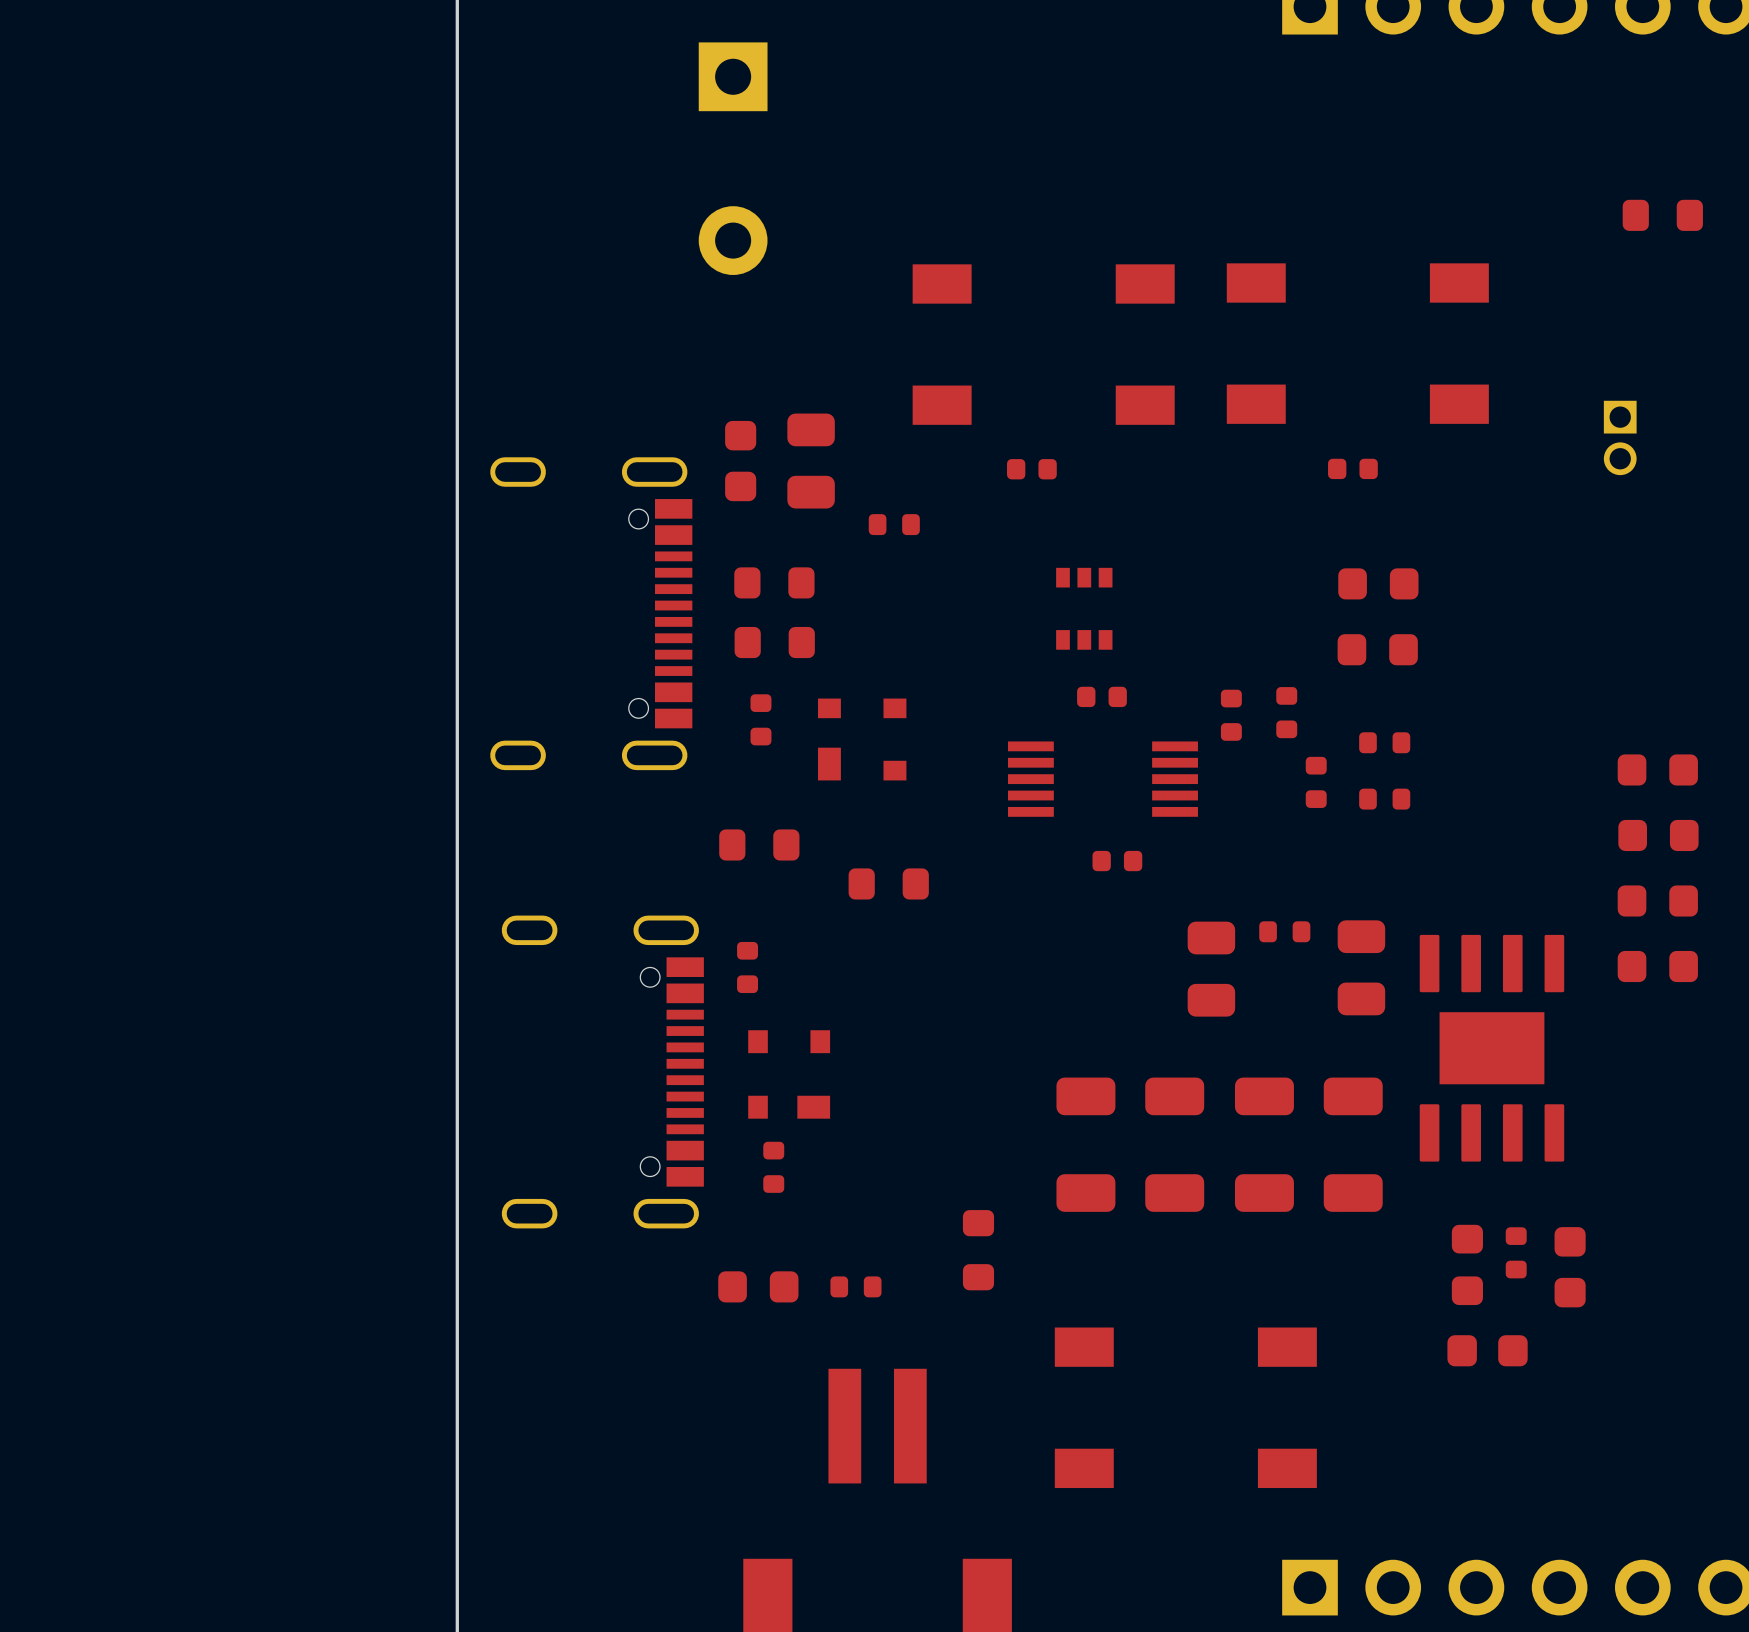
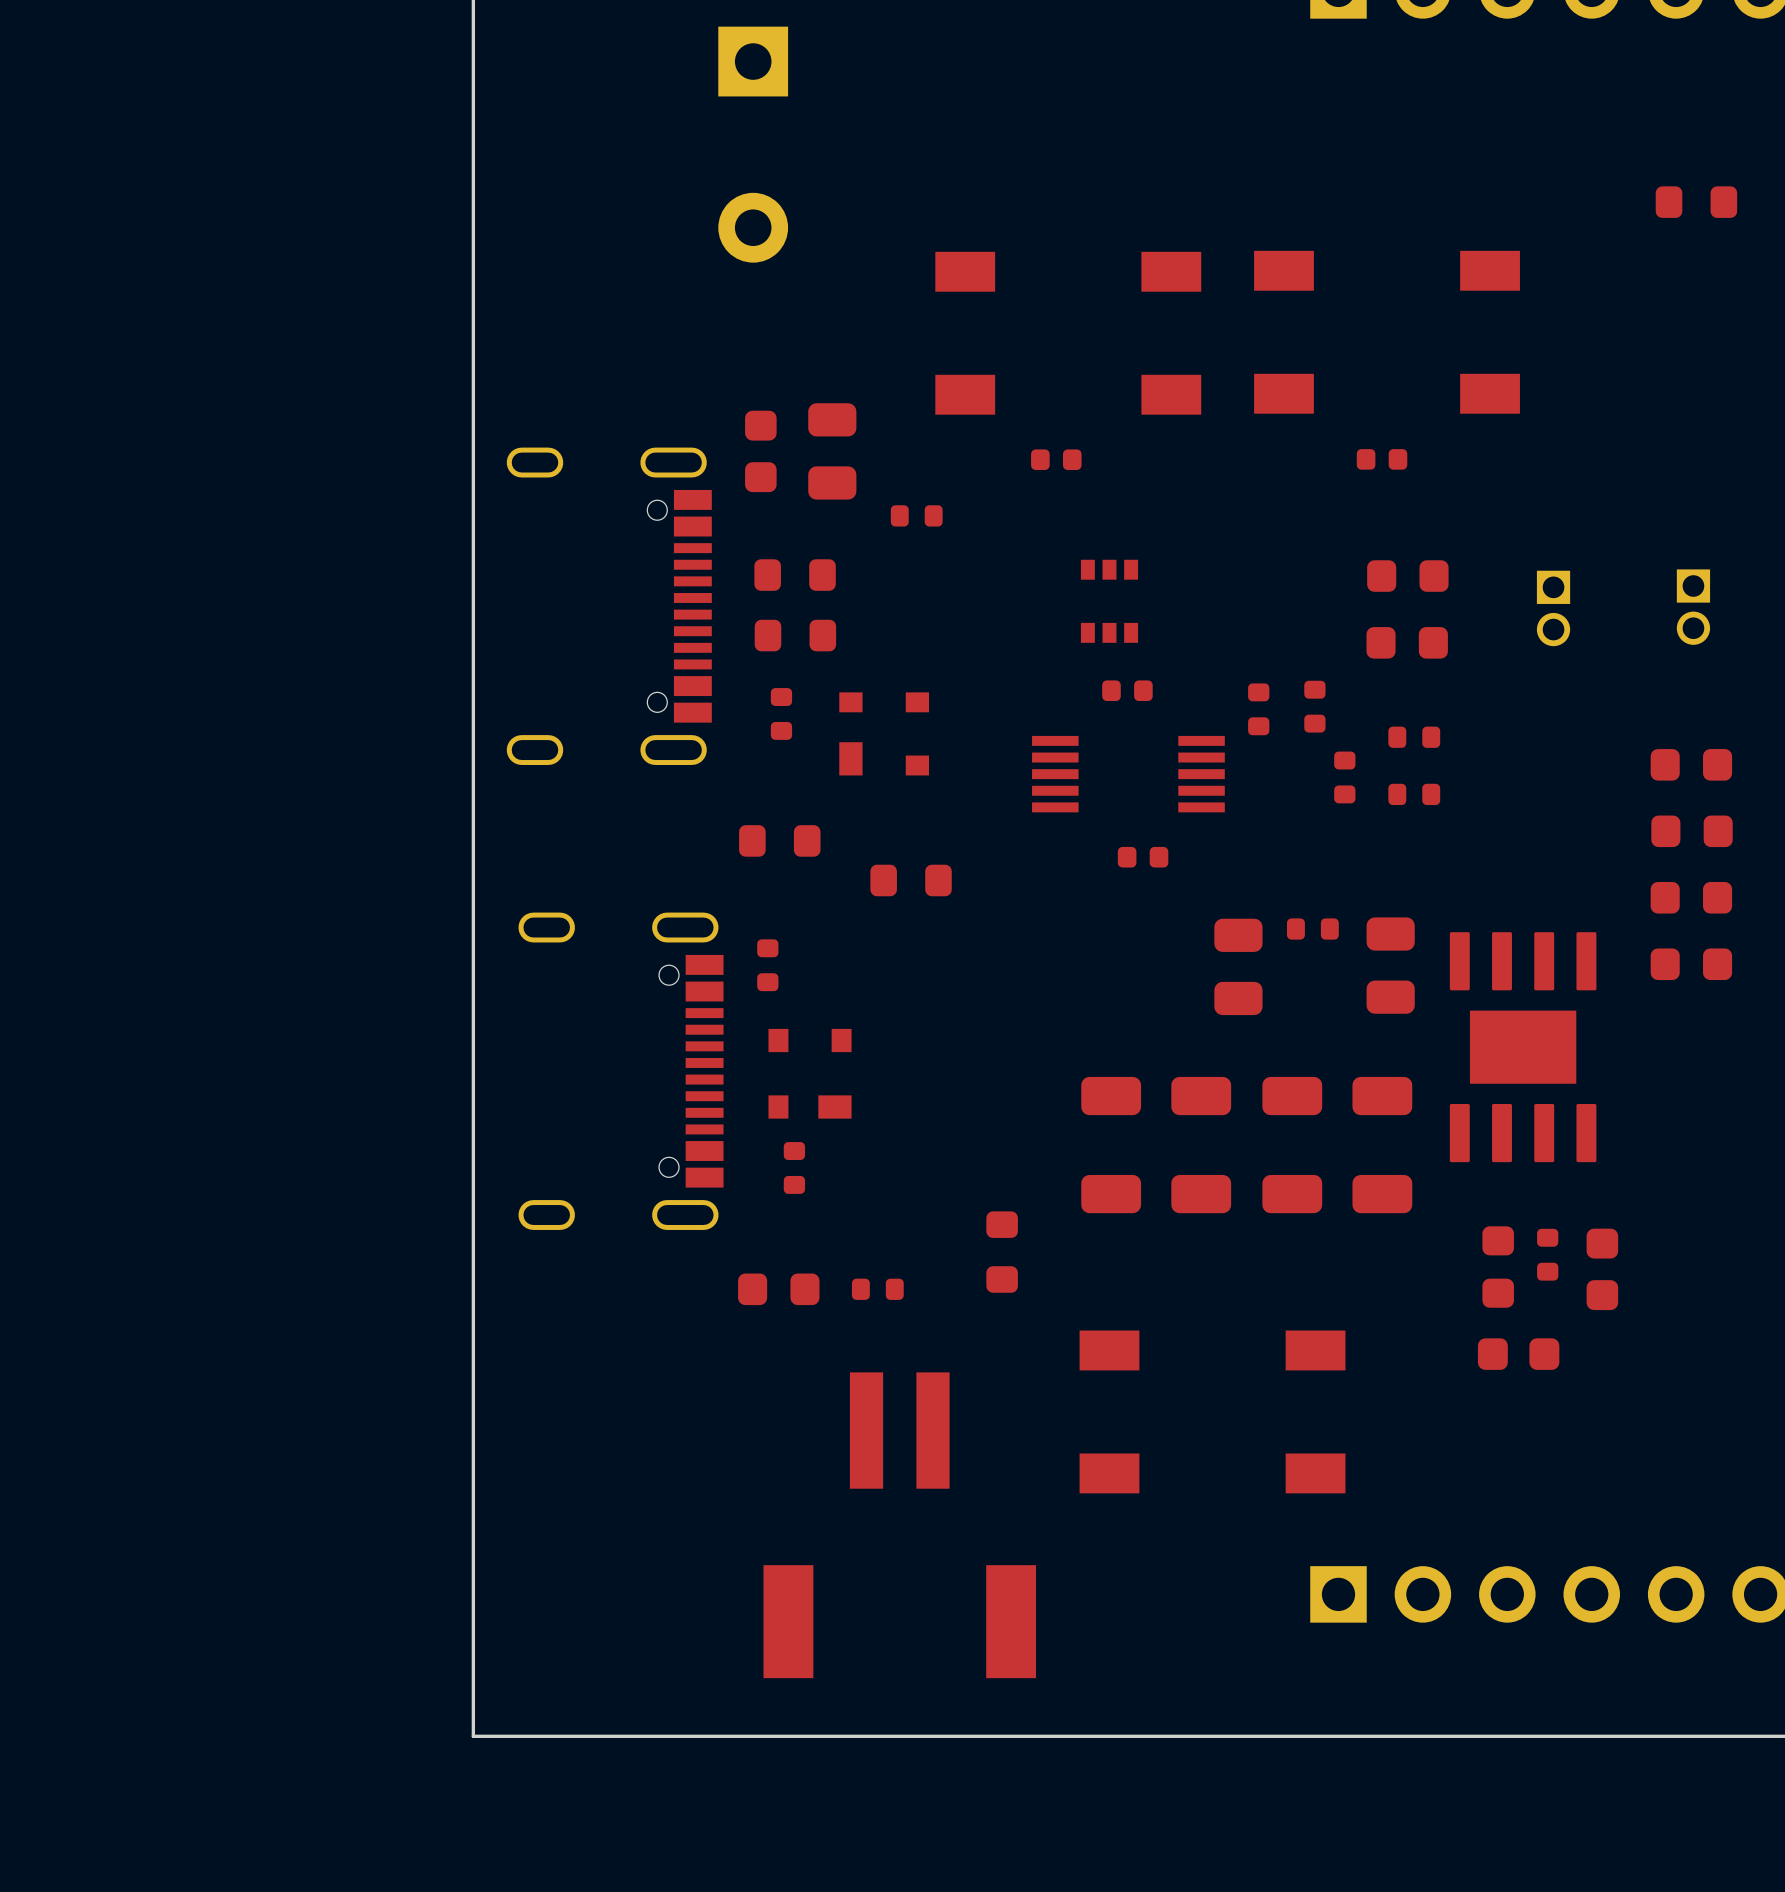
part: (1620, 437) -> none
part: none -> (1693, 607)
part: none -> (1553, 608)

